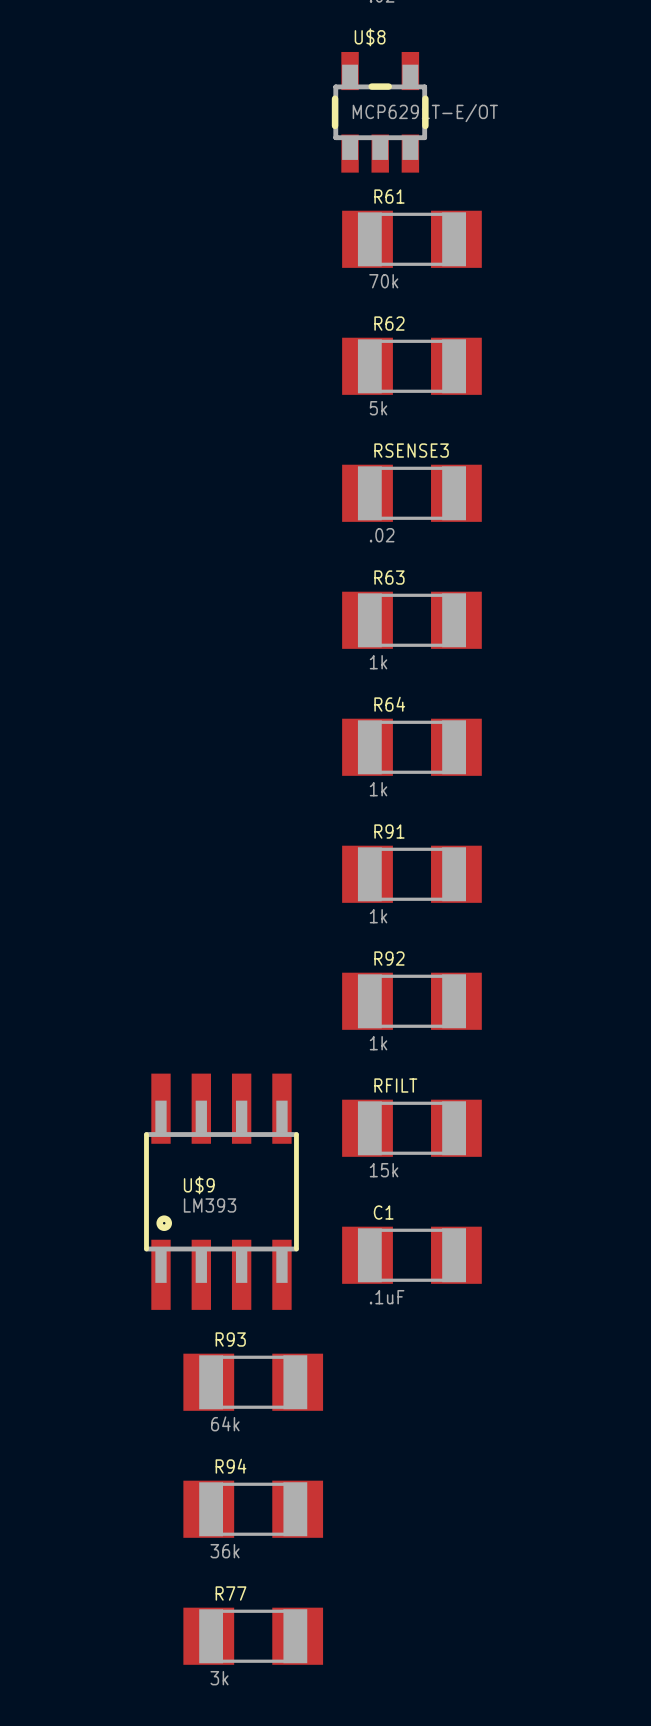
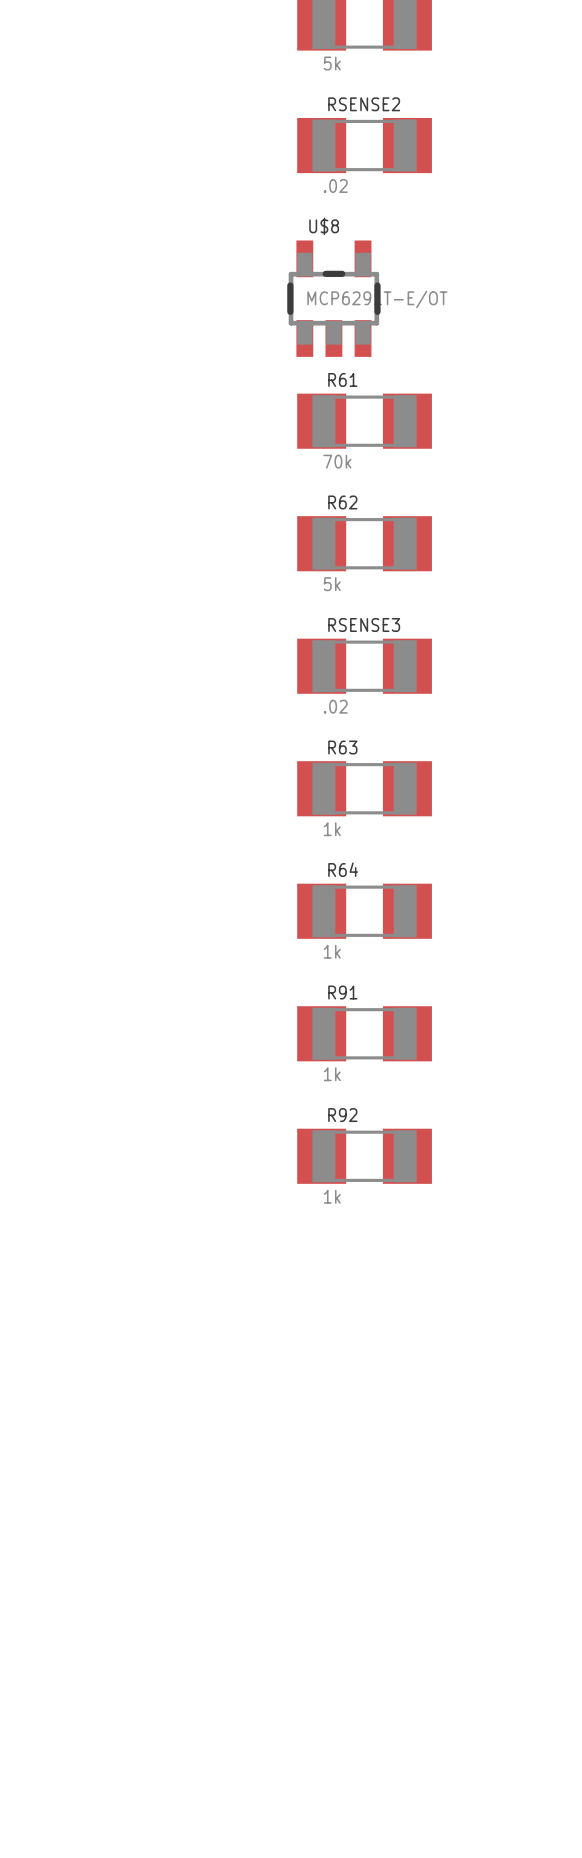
RFILT: 15k (411, 1128) -> none
U$9: LM393 (221, 1191) -> none
C1: .1uF (411, 1255) -> none
R93: 64k (253, 1382) -> none
R94: 36k (253, 1509) -> none
R77: 3k (253, 1636) -> none

